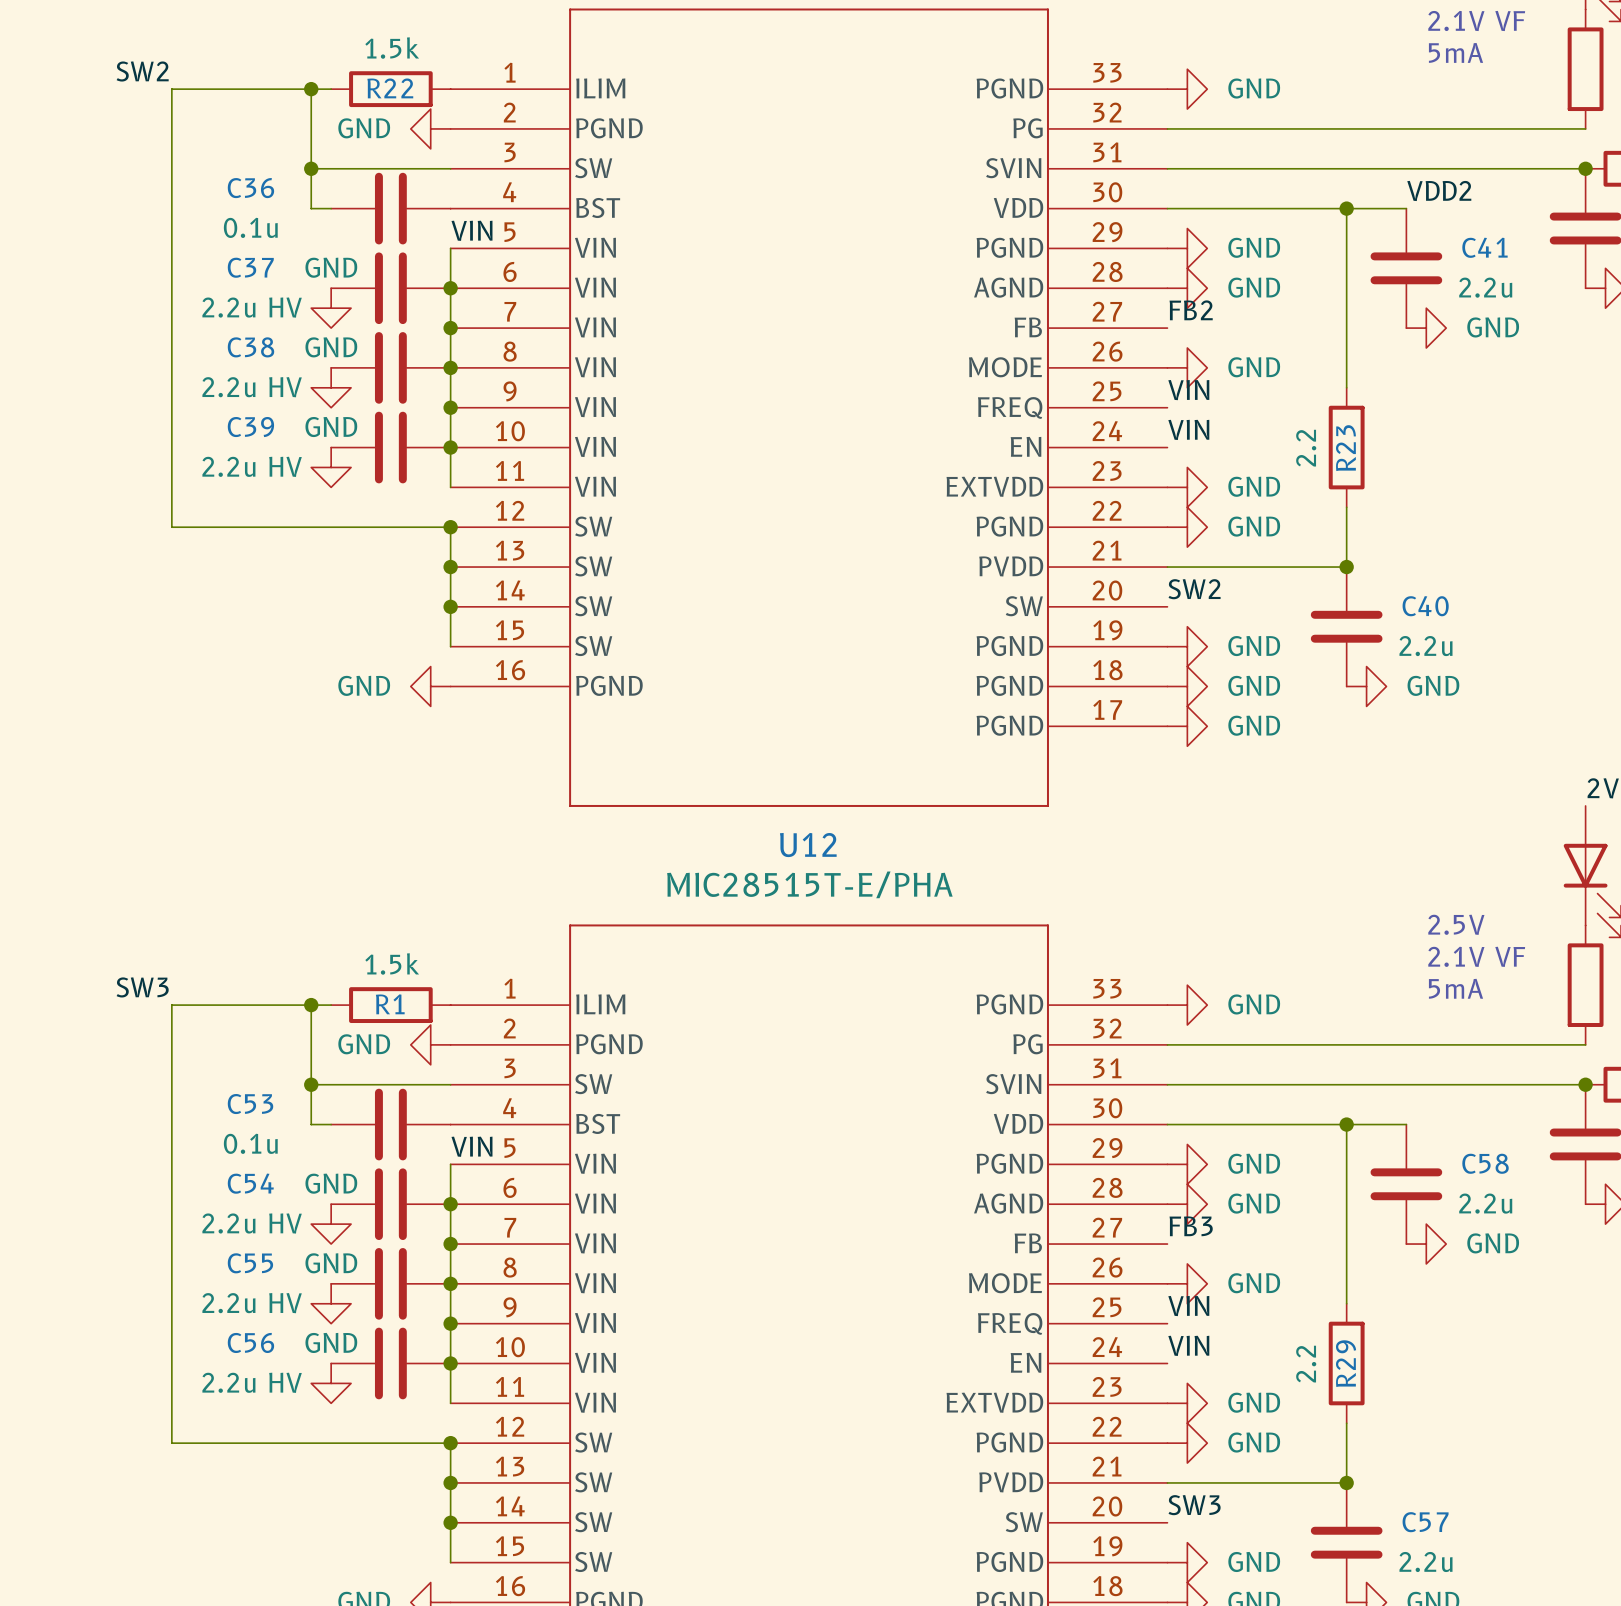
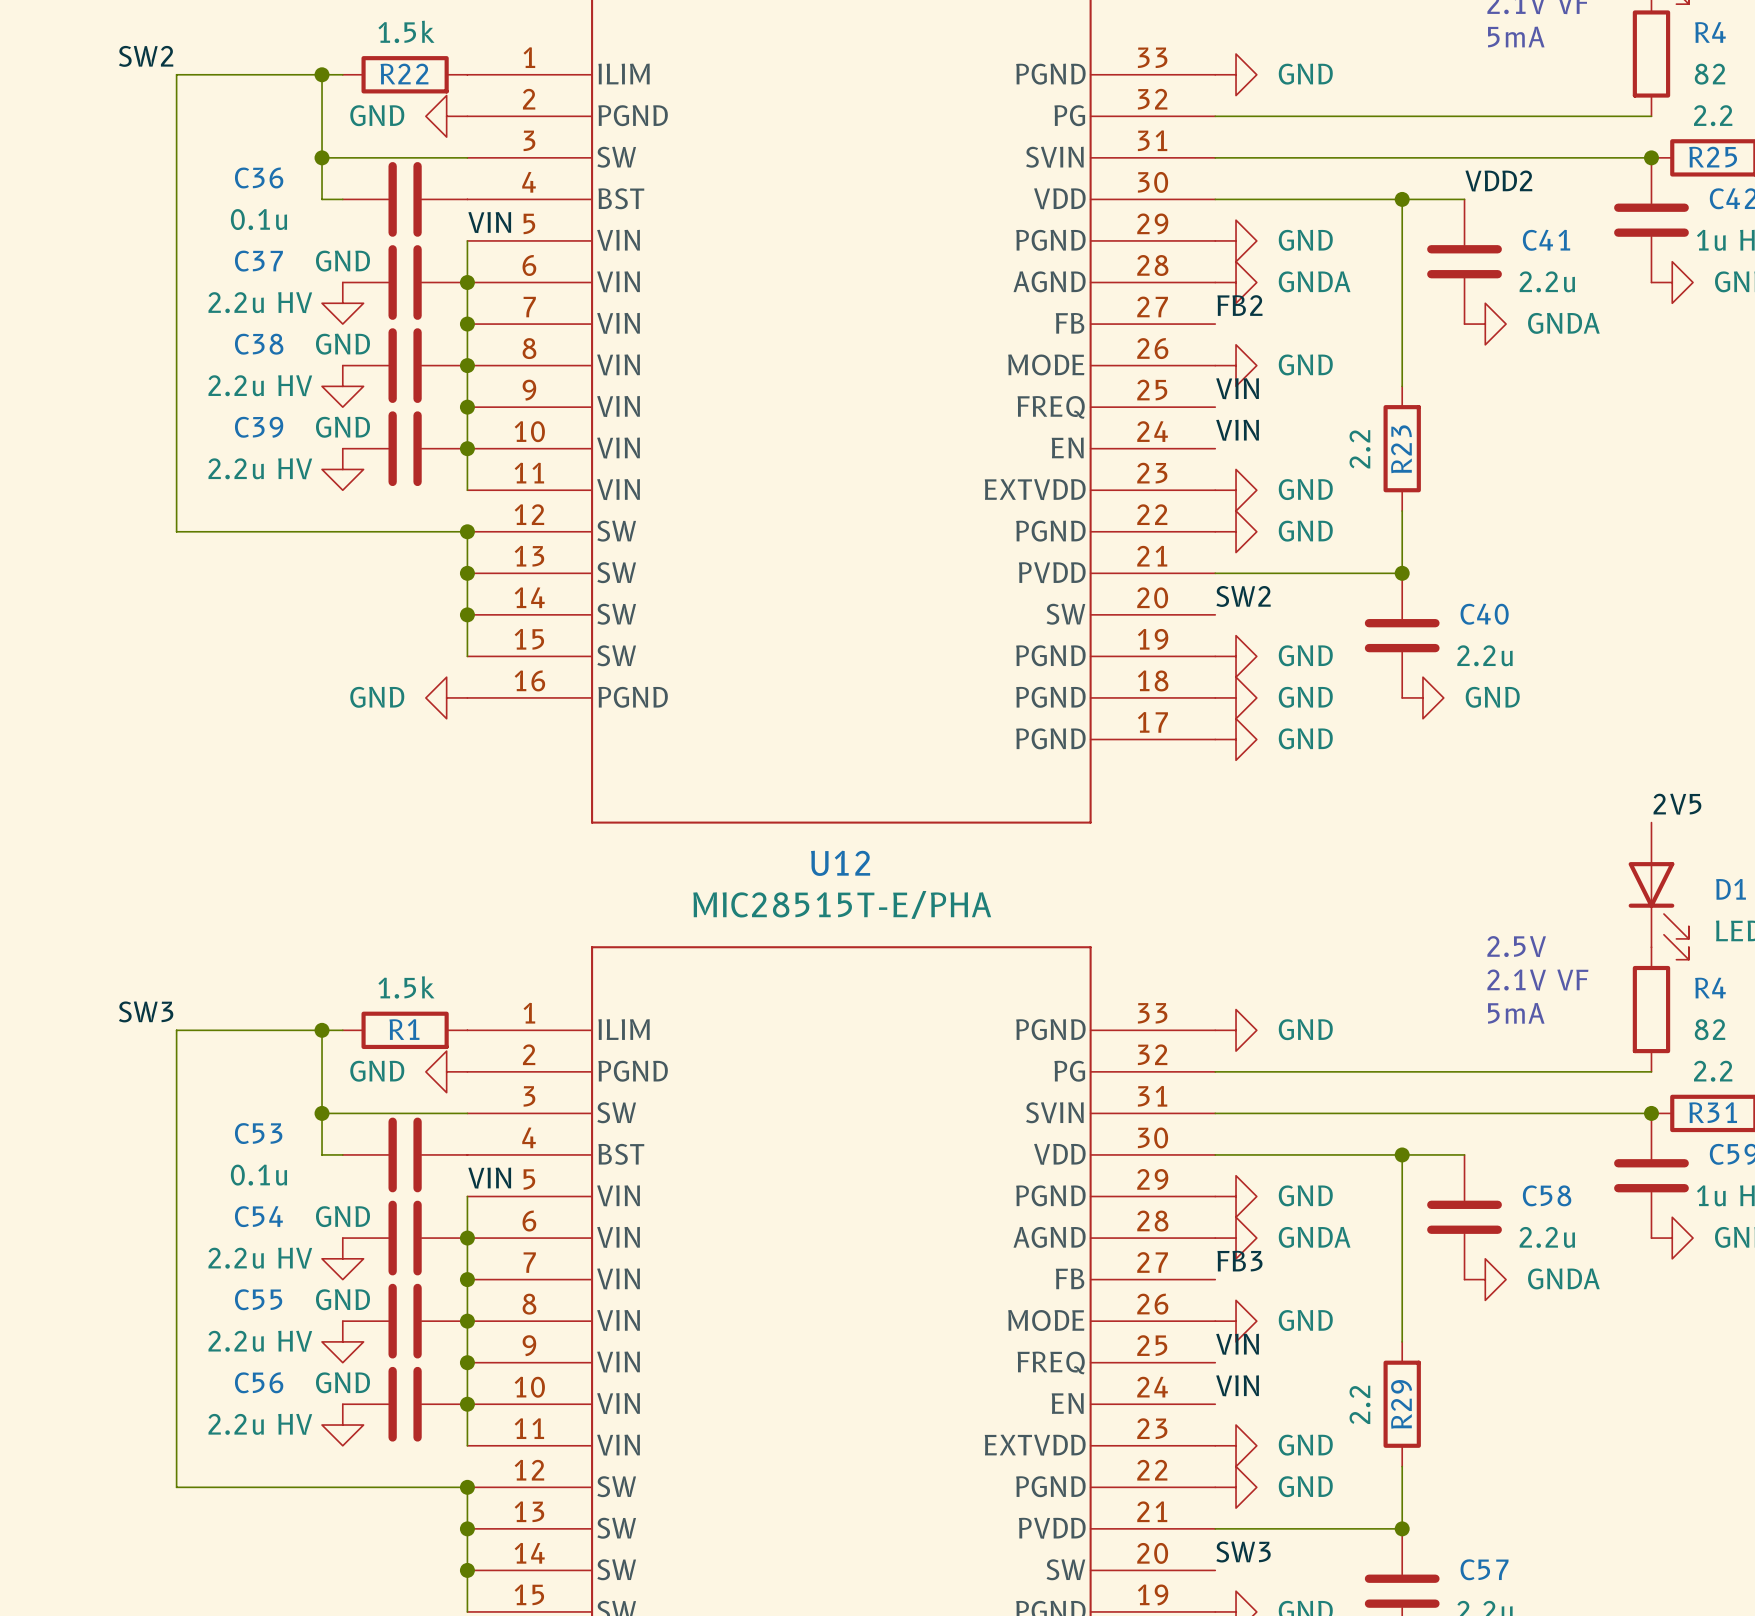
power symbol: GND (1187, 288) -> GNDA (1236, 282)
power symbol: GND (1426, 328) -> GNDA (1485, 324)
power symbol: GND (1187, 1204) -> GNDA (1236, 1238)
power symbol: GND (1426, 1244) -> GNDA (1485, 1279)

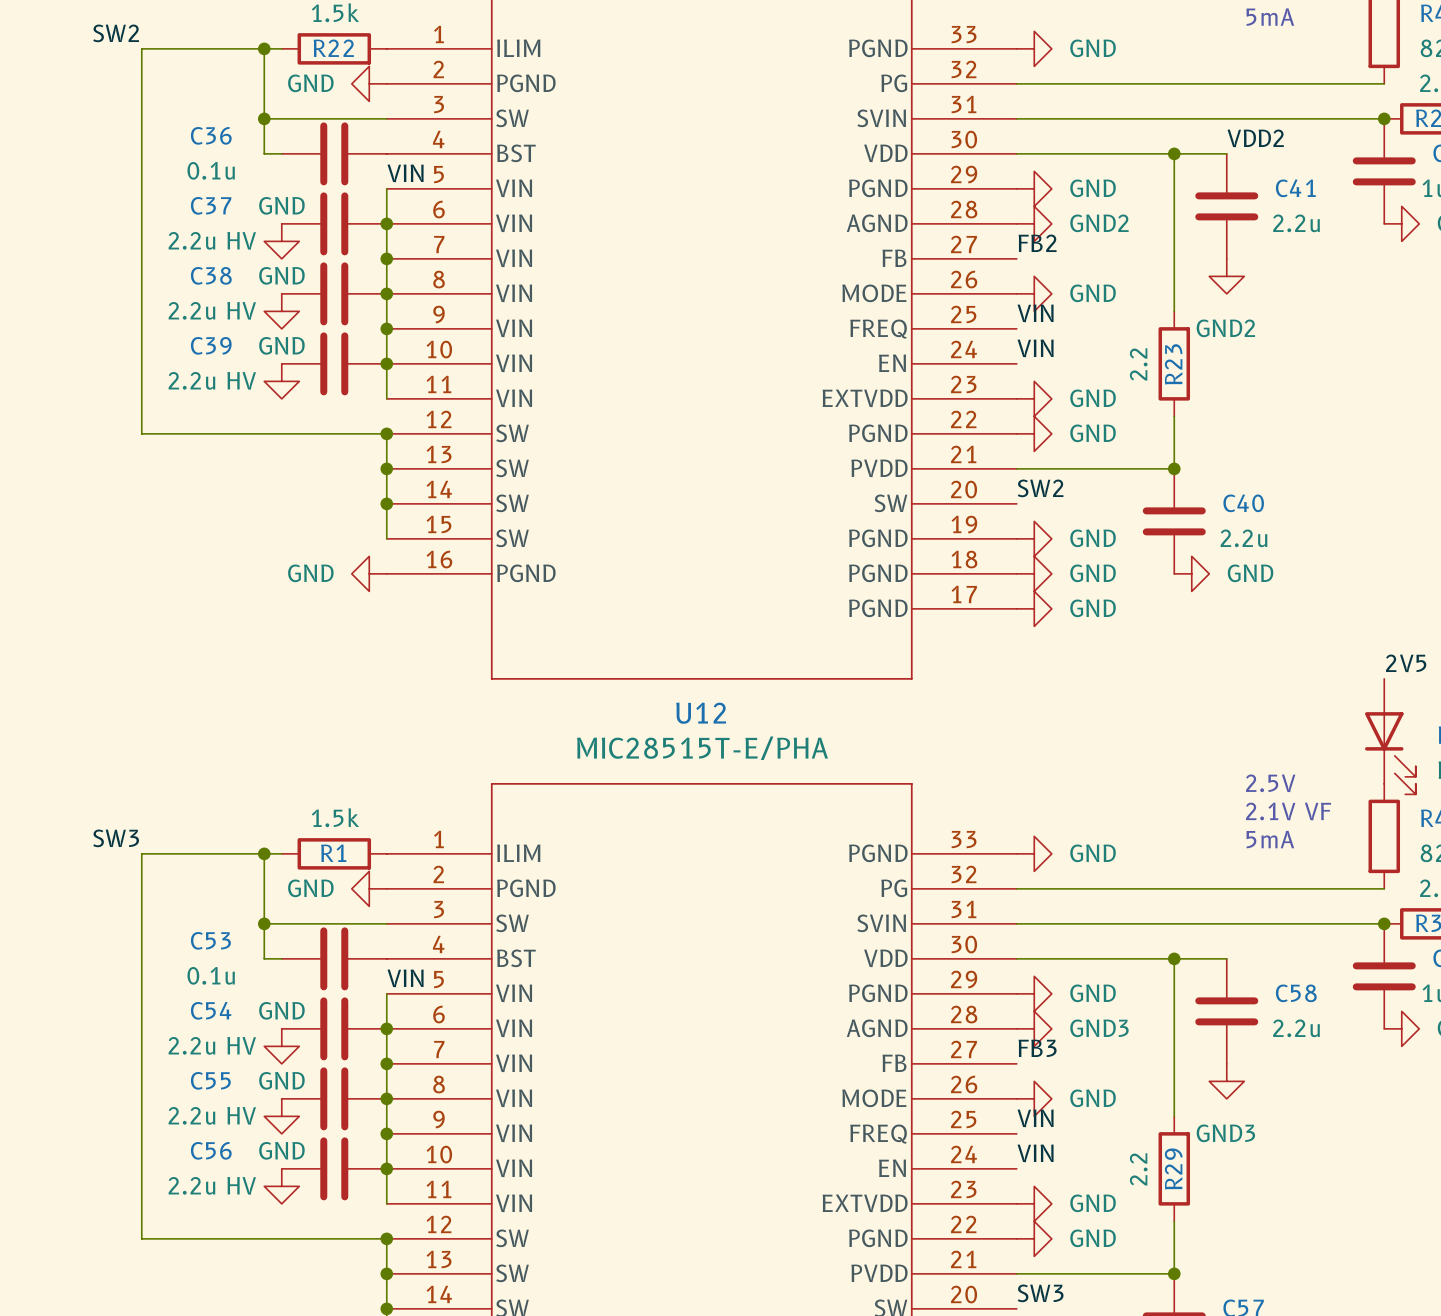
power symbol: GNDA (1236, 282) -> GND2 (1034, 223)
power symbol: GNDA (1485, 324) -> none
power symbol: none -> GND2 (1226, 276)
power symbol: GNDA (1236, 1238) -> GND3 (1034, 1028)
power symbol: GNDA (1485, 1279) -> none
power symbol: none -> GND3 (1226, 1081)

